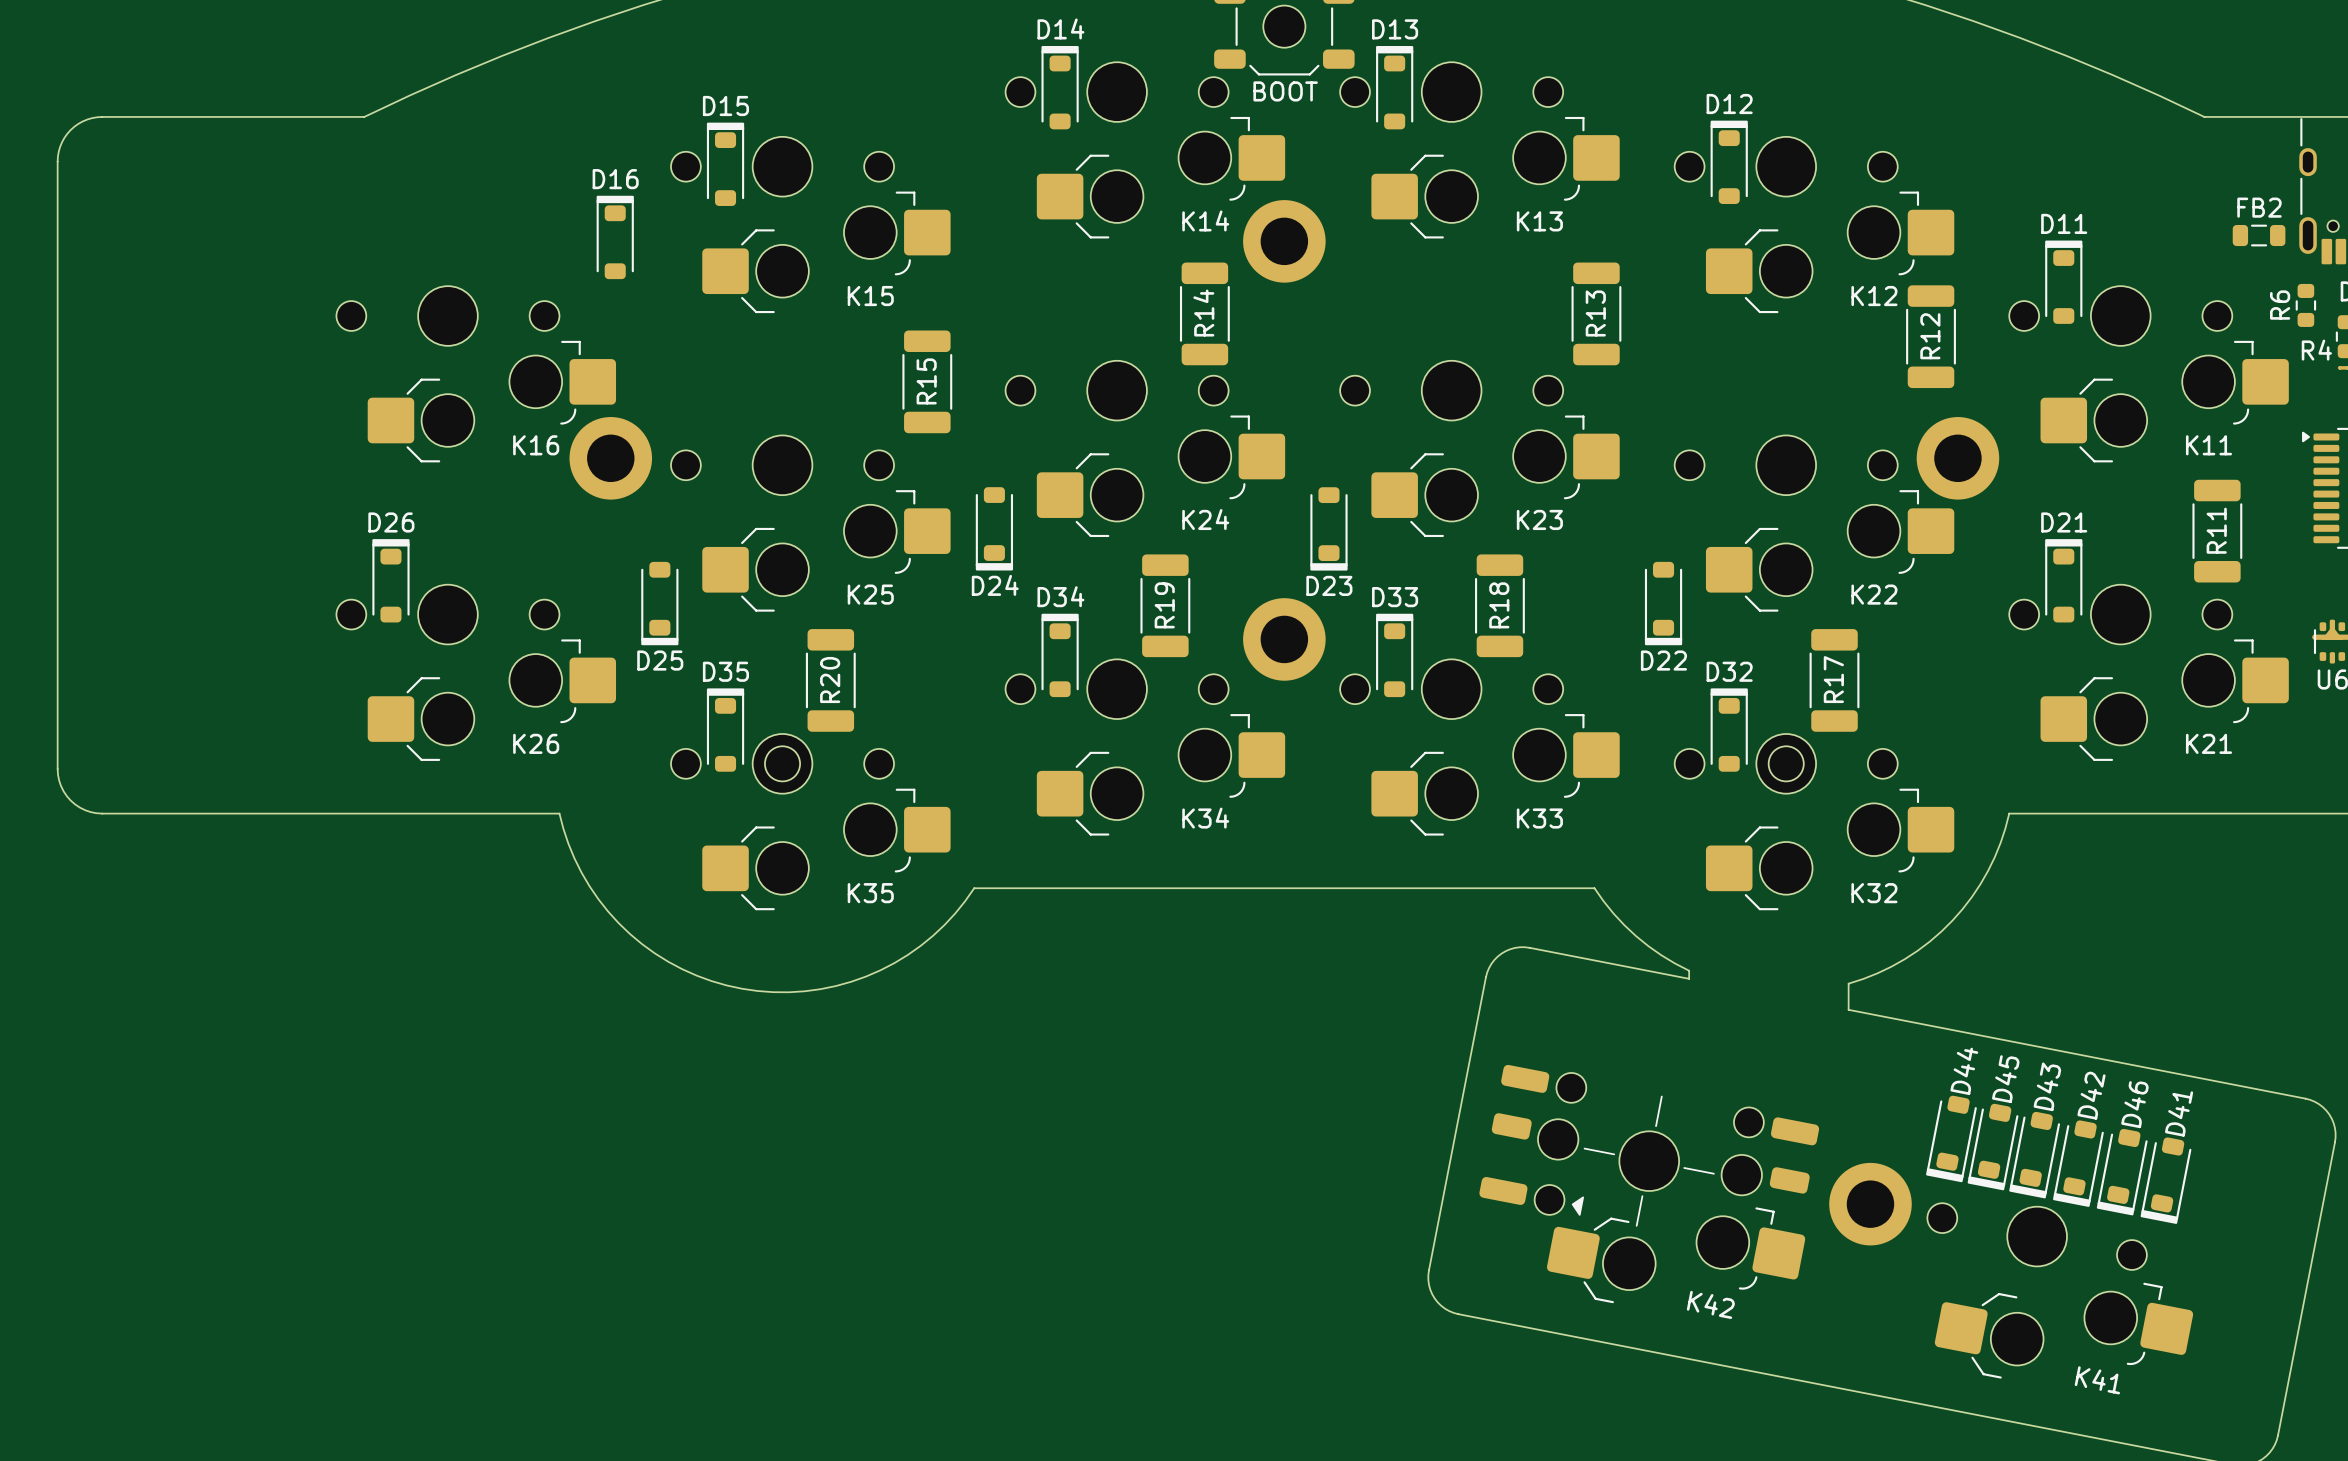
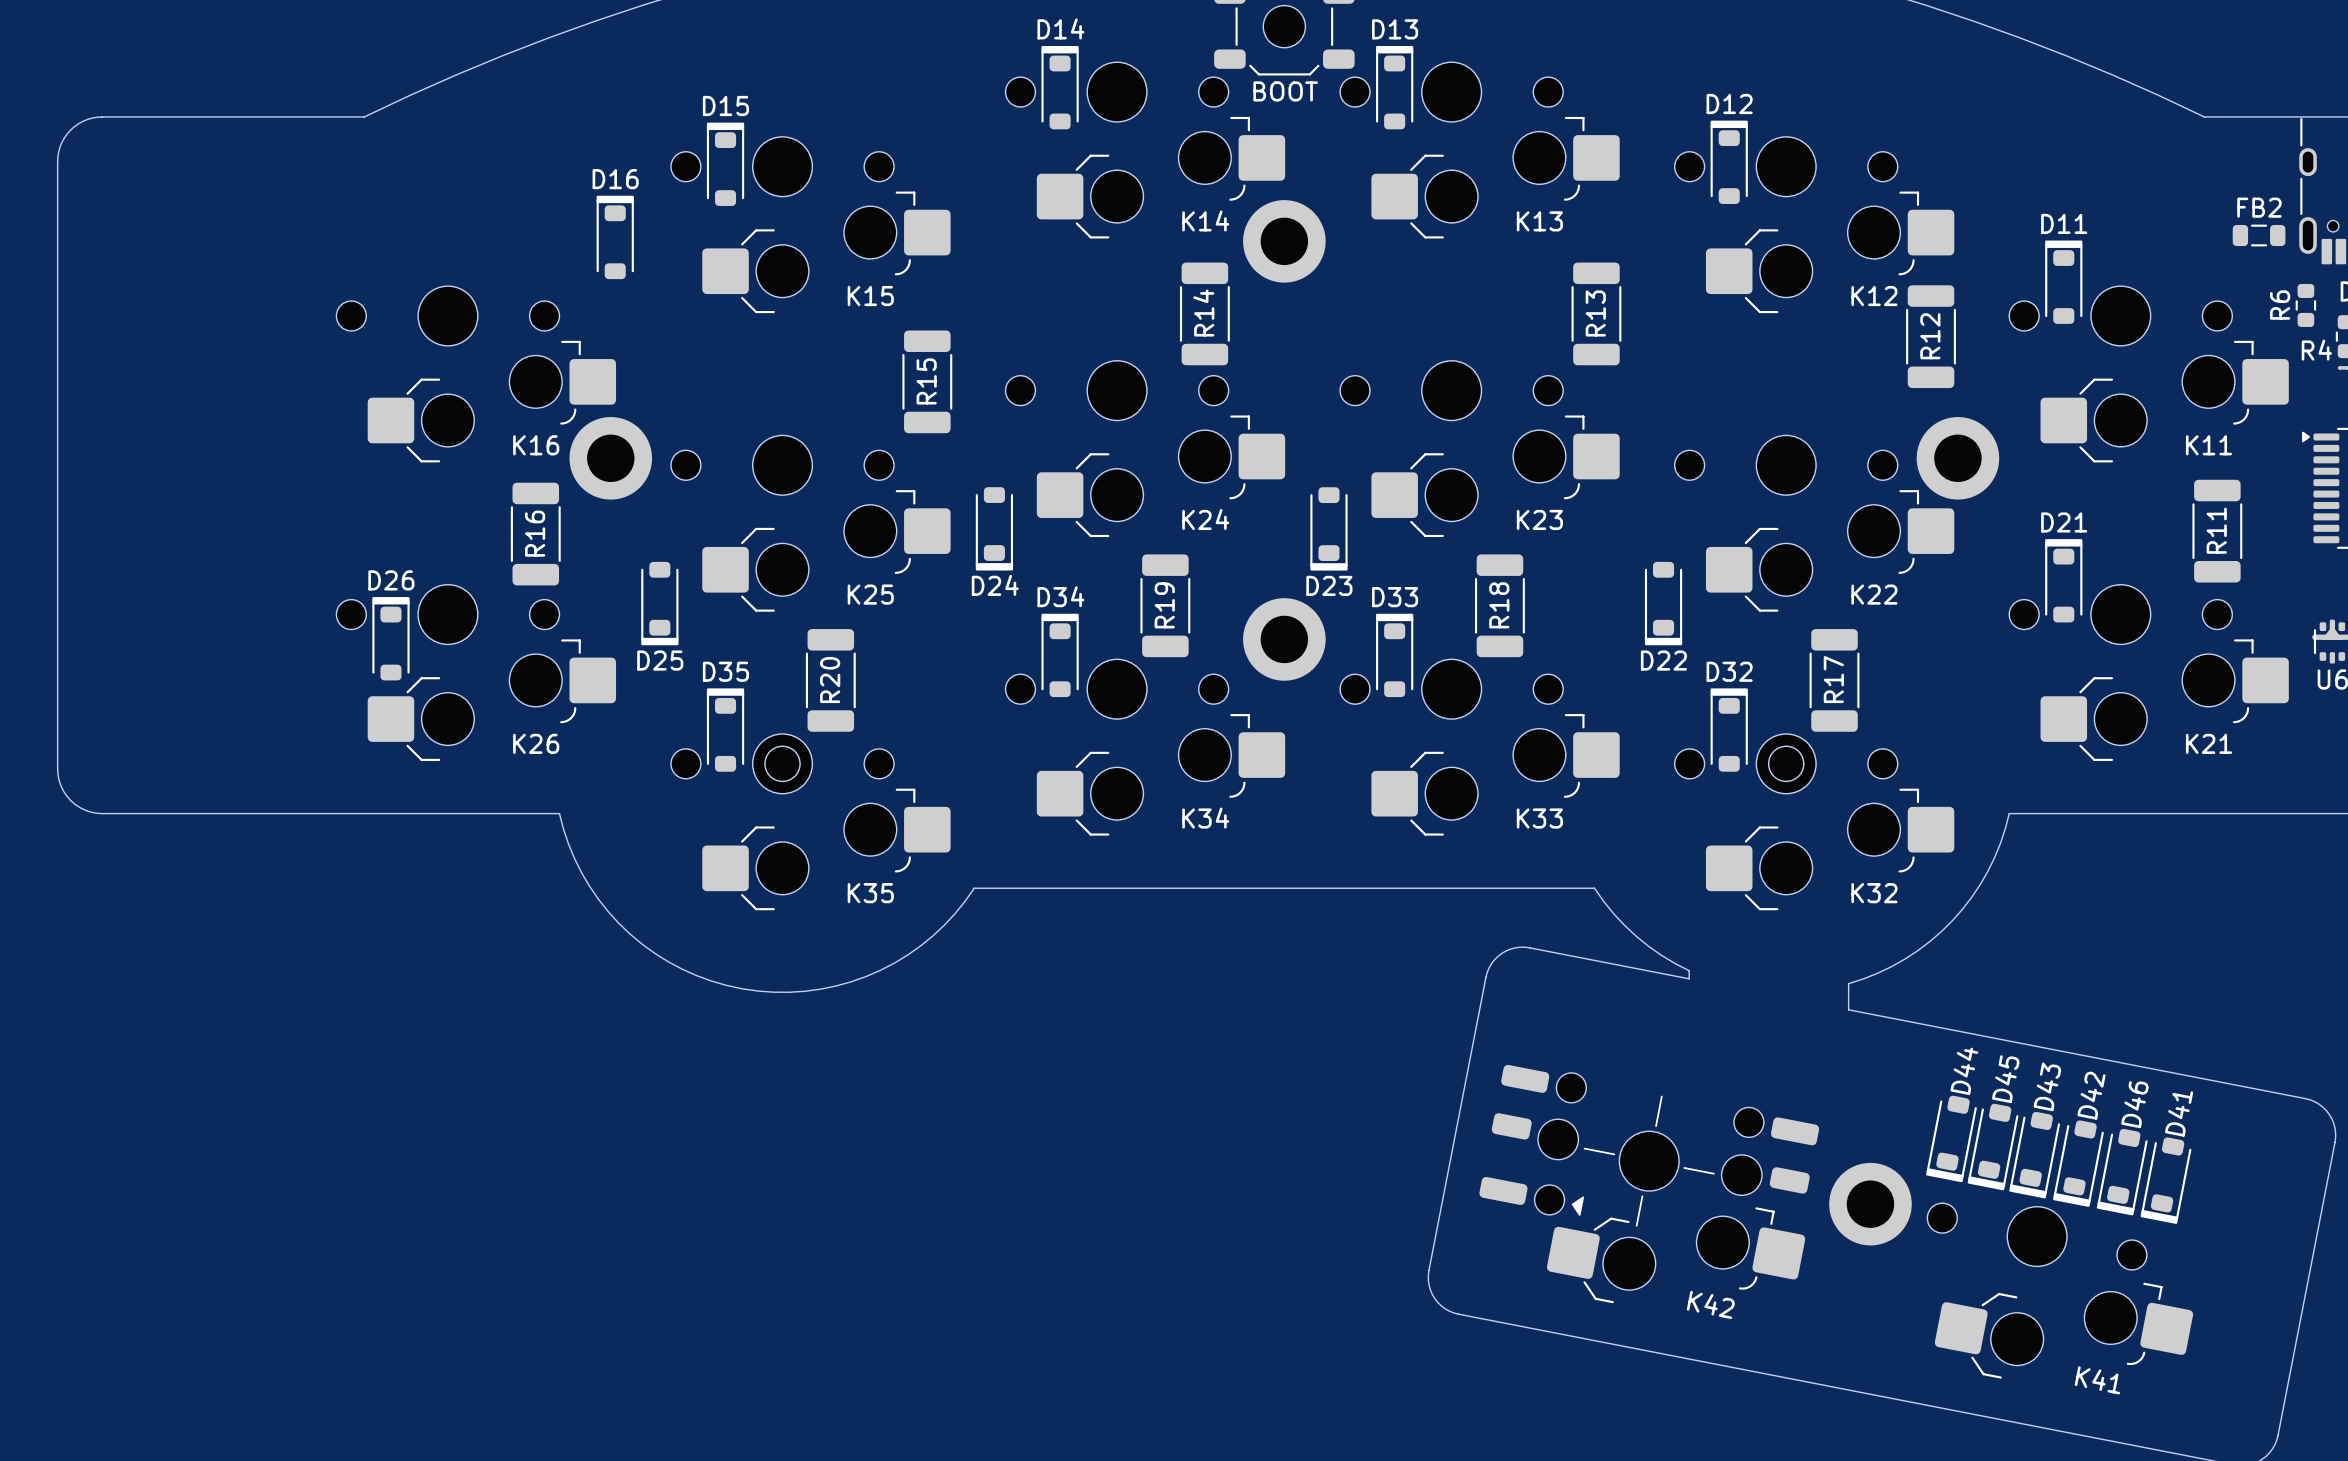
R16: none -> (535, 534)
D26 position: (390, 580) -> (390, 638)

